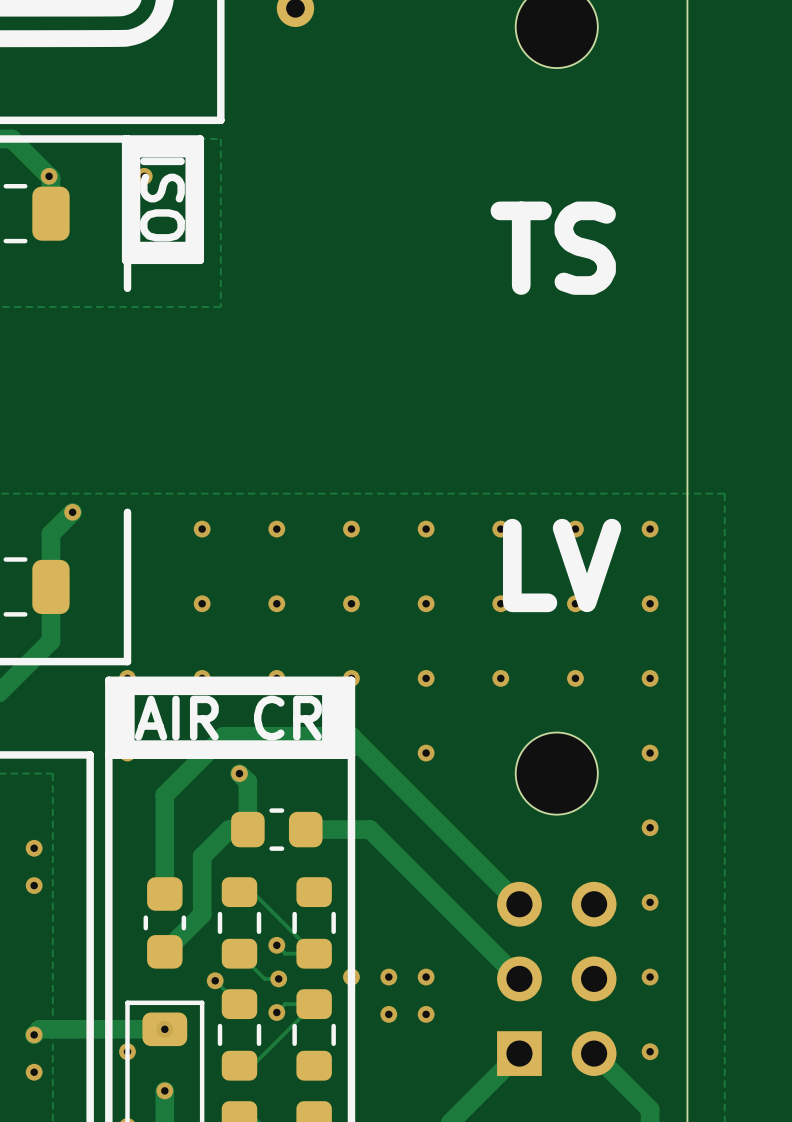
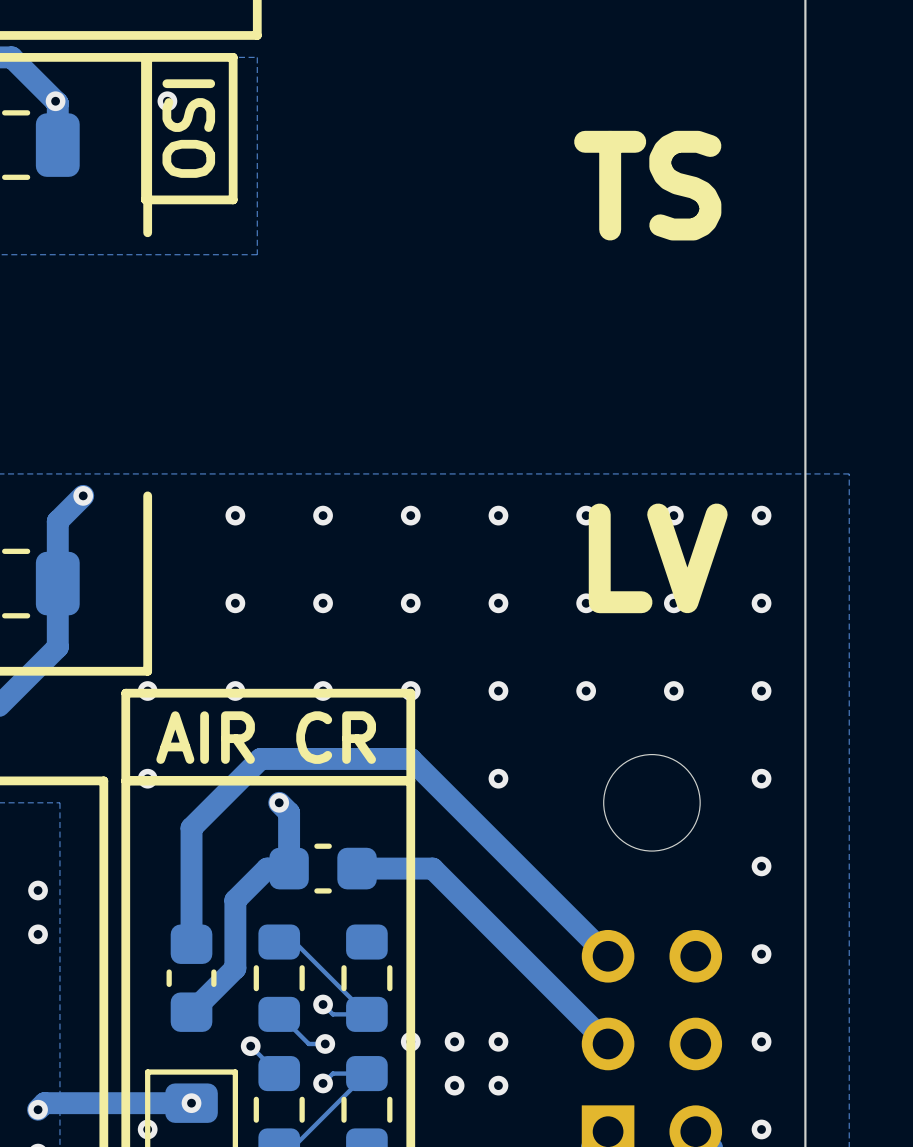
drawing: [127, 138, 201, 261] -> none
drawing: [108, 680, 352, 755] -> none

